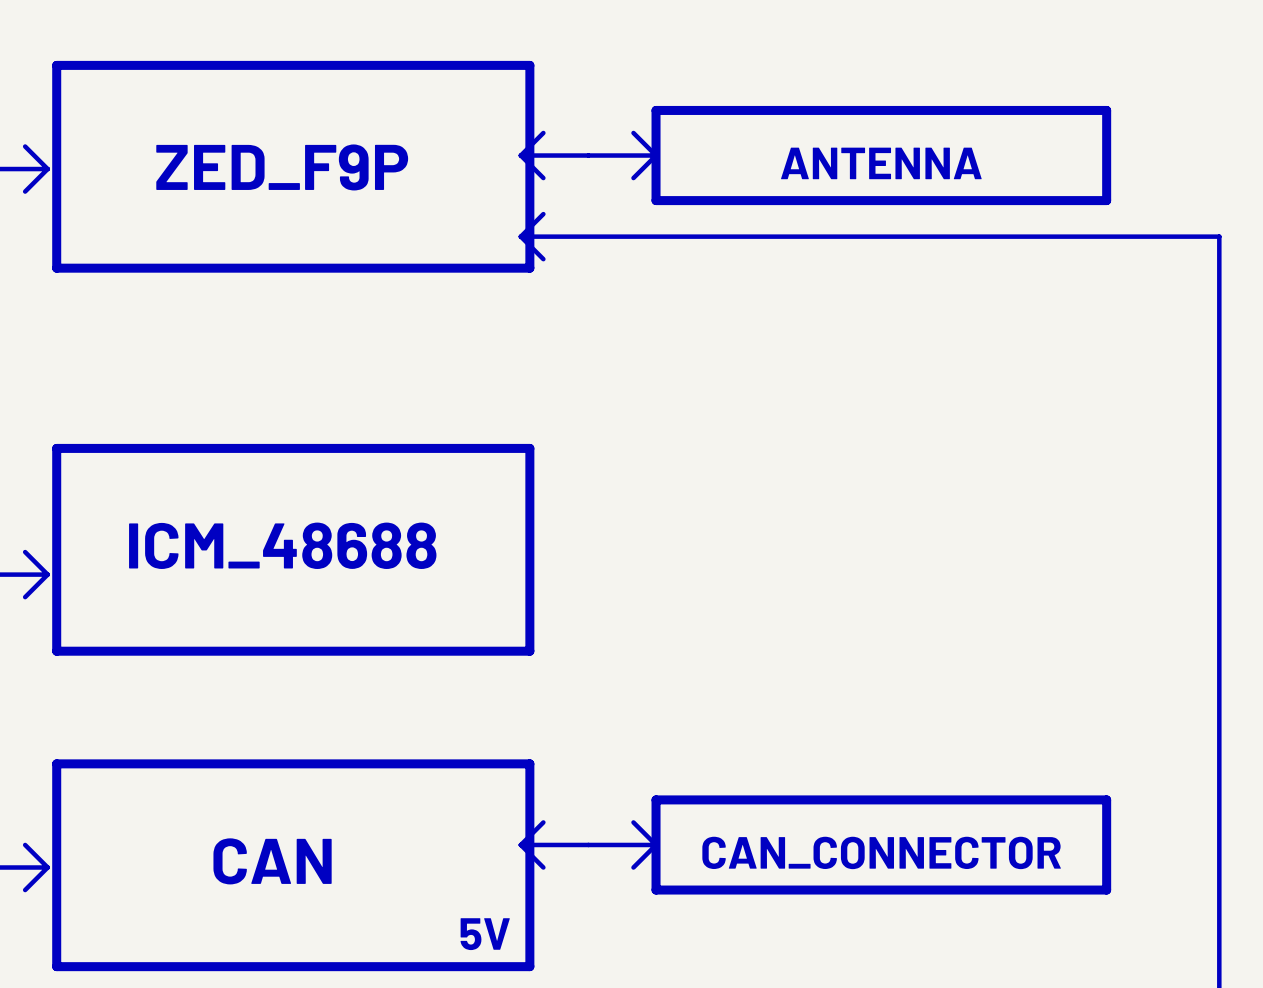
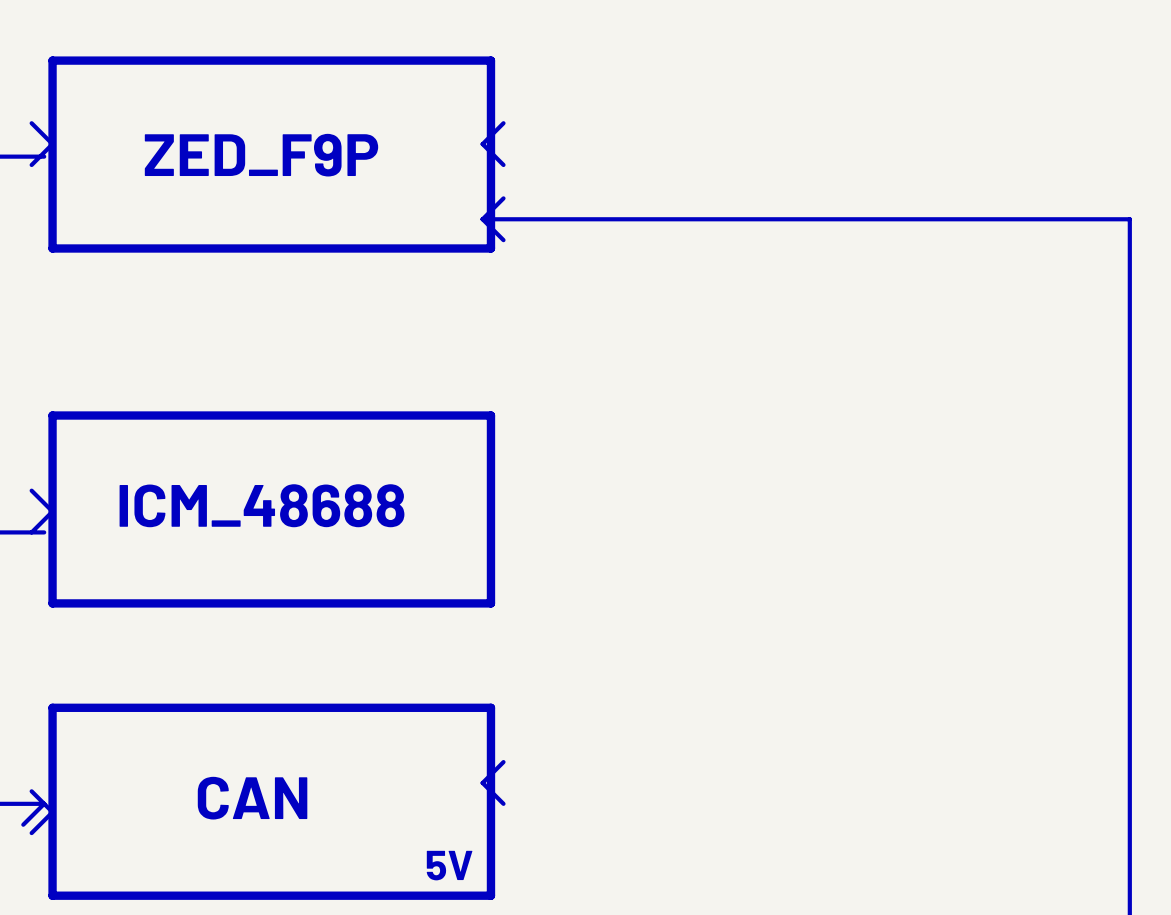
line: (656, 110) (656, 200) (1106, 200) (1106, 110) (656, 110) -> none
line: (633, 132) (656, 155) -> none
line: (25, 146) (47, 169) (25, 191) -> (31, 123) (52, 144) (31, 164)
line: (520, 155) (656, 155) -> none
line: (656, 155) (633, 178) -> none
text: ANTENNA (881, 163) -> none
line: (25, 552) (47, 574) (25, 597) -> (31, 490) (52, 511) (31, 532)
line: (656, 799) (1106, 799) (1106, 890) (656, 890) (656, 799) -> none
line: (633, 822) (656, 844) -> none
line: (25, 844) (34, 853) -> none
line: (520, 844) (656, 844) -> none
line: (656, 844) (633, 867) -> none
text: CAN_CONNECTOR (881, 852) -> none
line: none -> (44, 803) (52, 812) (31, 833)

